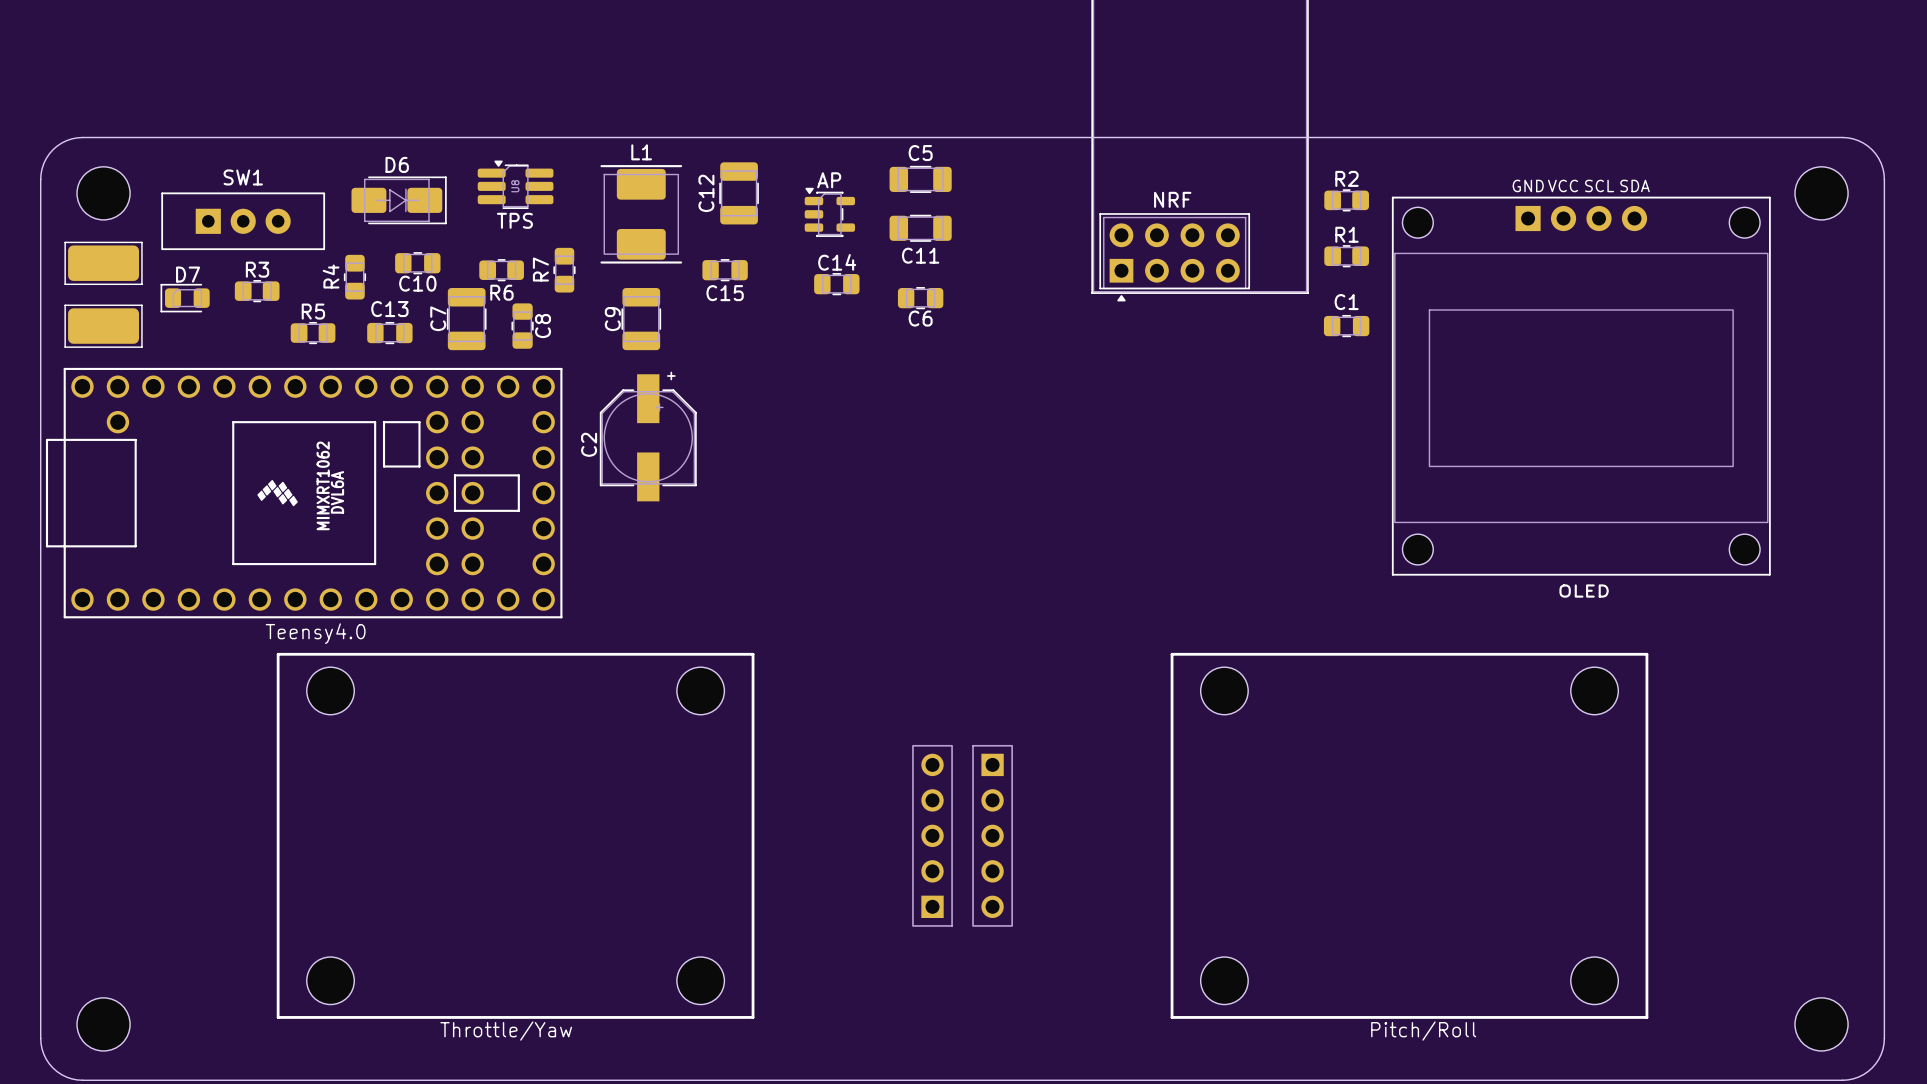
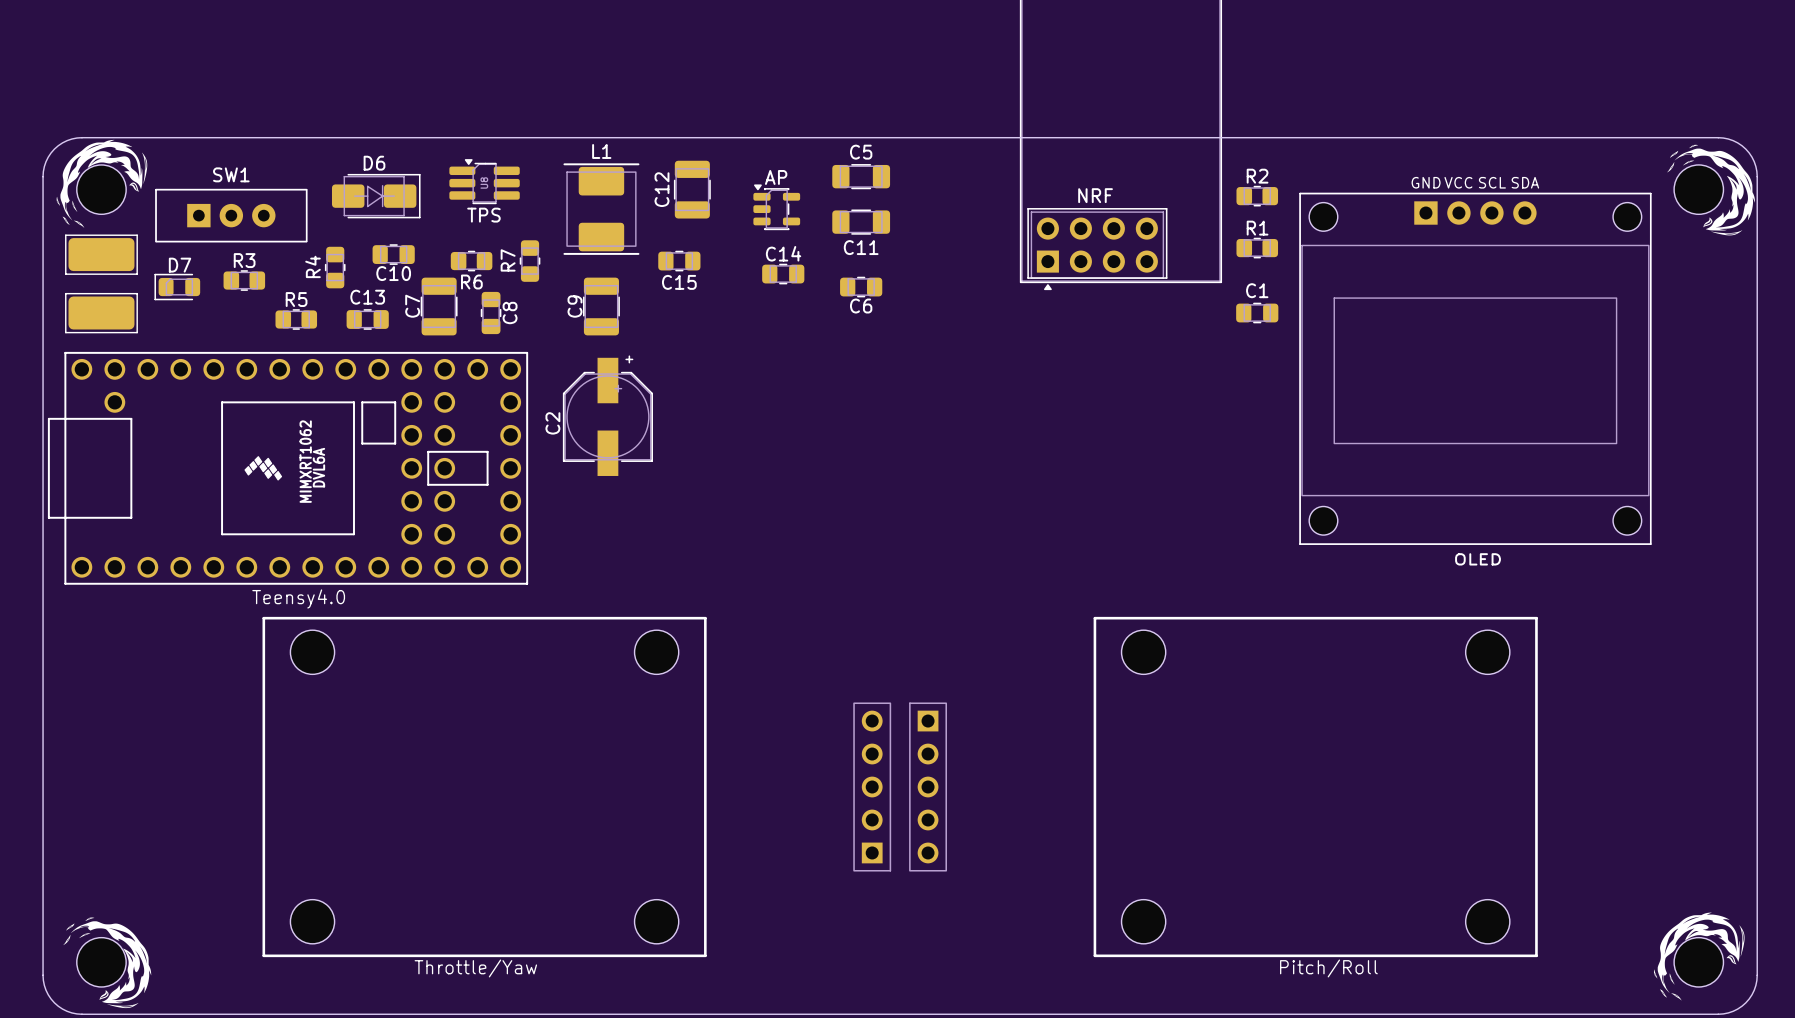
drawing: none -> [56, 139, 148, 228]
drawing: none -> [1667, 144, 1756, 236]
drawing: none -> [1653, 912, 1745, 1001]
drawing: none -> [63, 917, 152, 1009]

